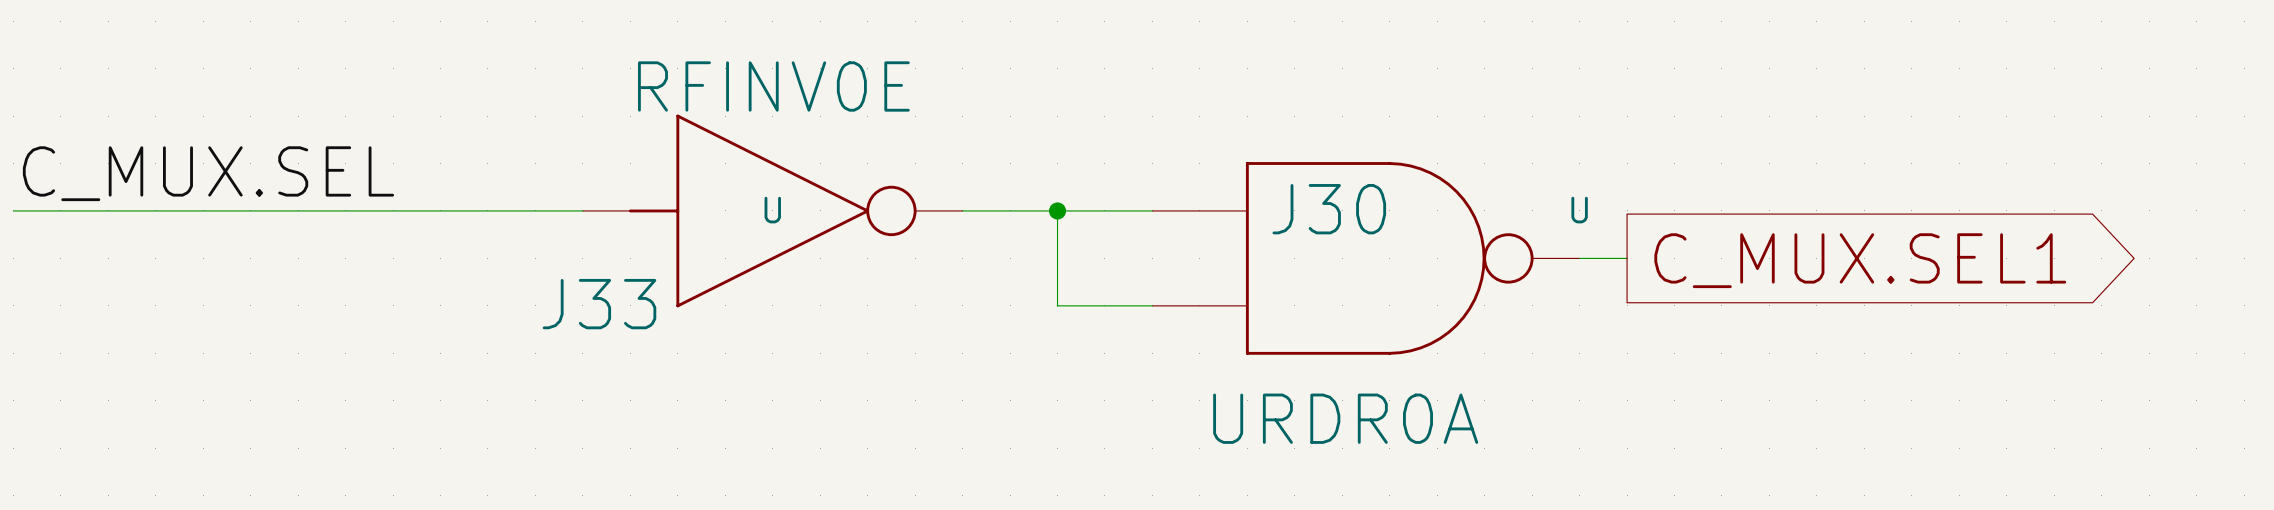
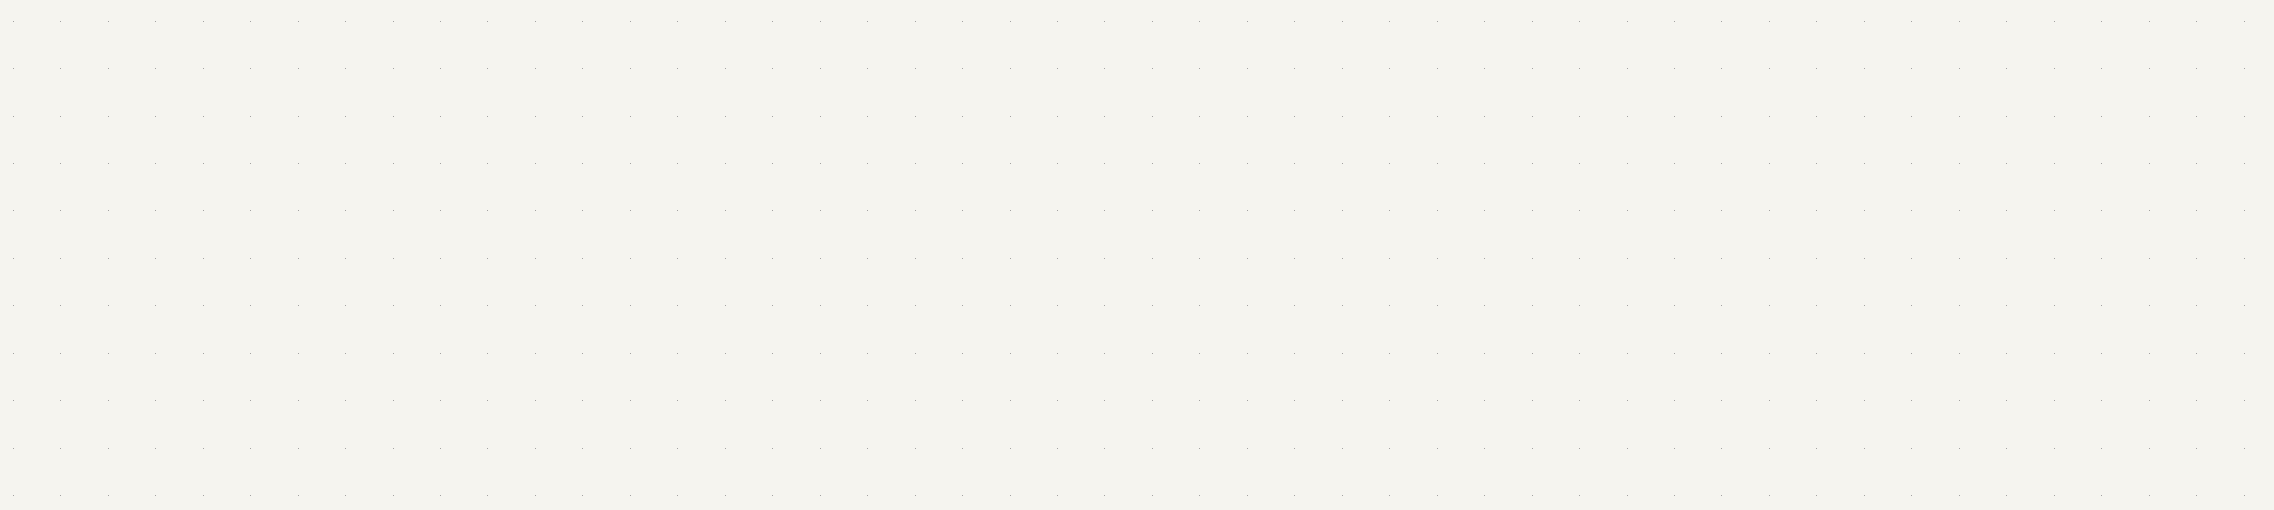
label: C_MUX.SEL (208, 173) -> none
wire: (13, 210) (582, 210) -> none
U: (772, 210) -> none
wire: (962, 210) (1152, 210) -> none
wire: (1057, 210) (1057, 305) (1152, 305) -> none
junction: (1057, 210) -> none
U: (1366, 258) -> none
wire: (1579, 258) (1627, 258) -> none
global label: C_MUX.SEL1 (1860, 260) -> none

